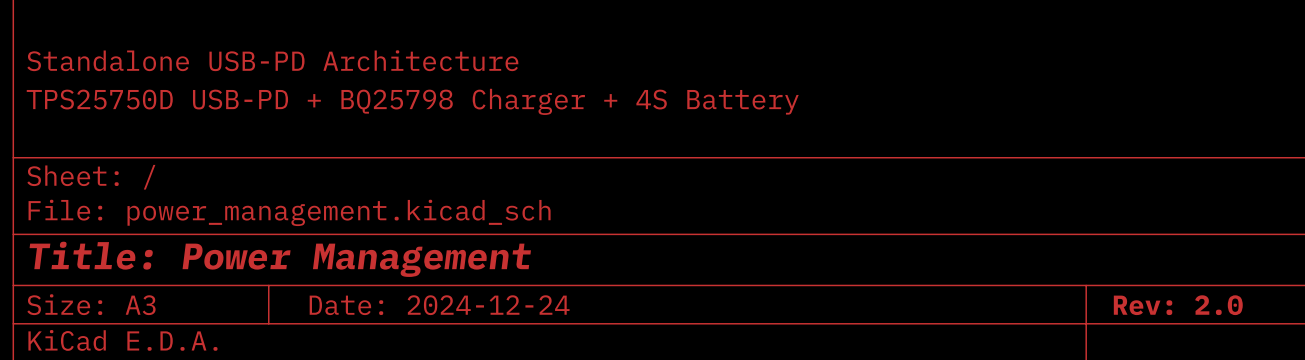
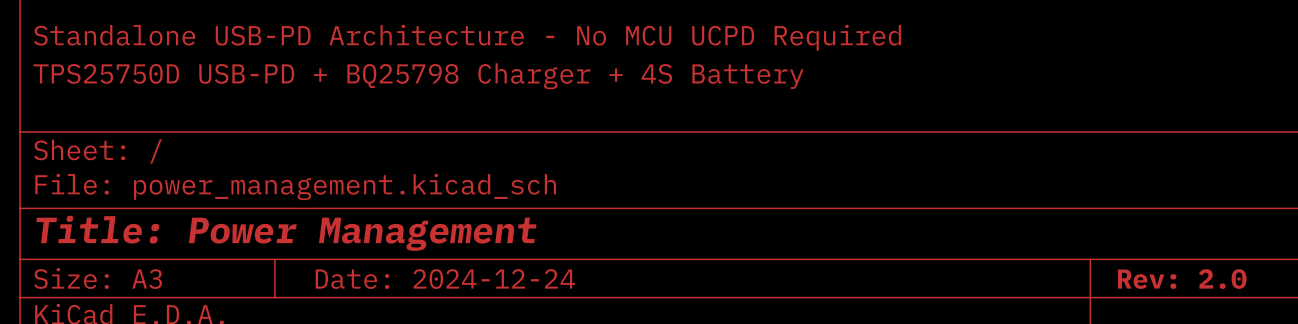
title block: Standalone USB-PD Architecture (272, 60) -> Standalone USB-PD Architecture - No MCU UCPD Required (467, 37)

